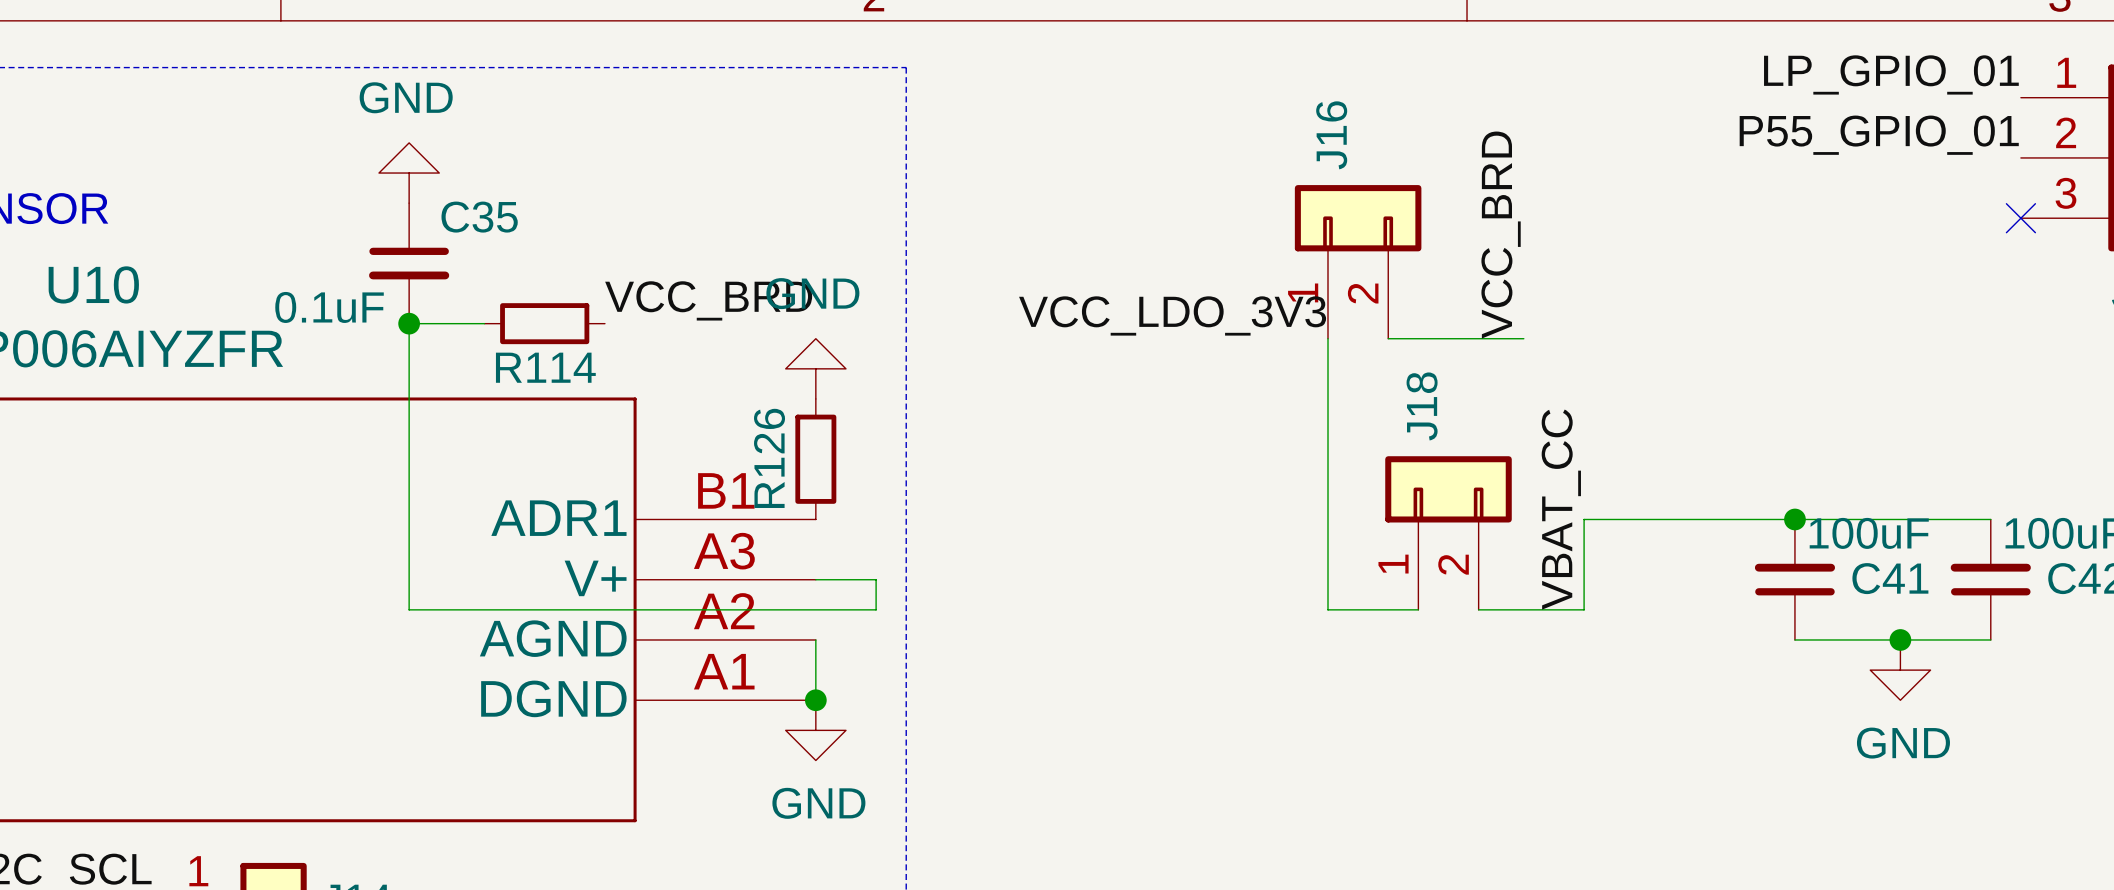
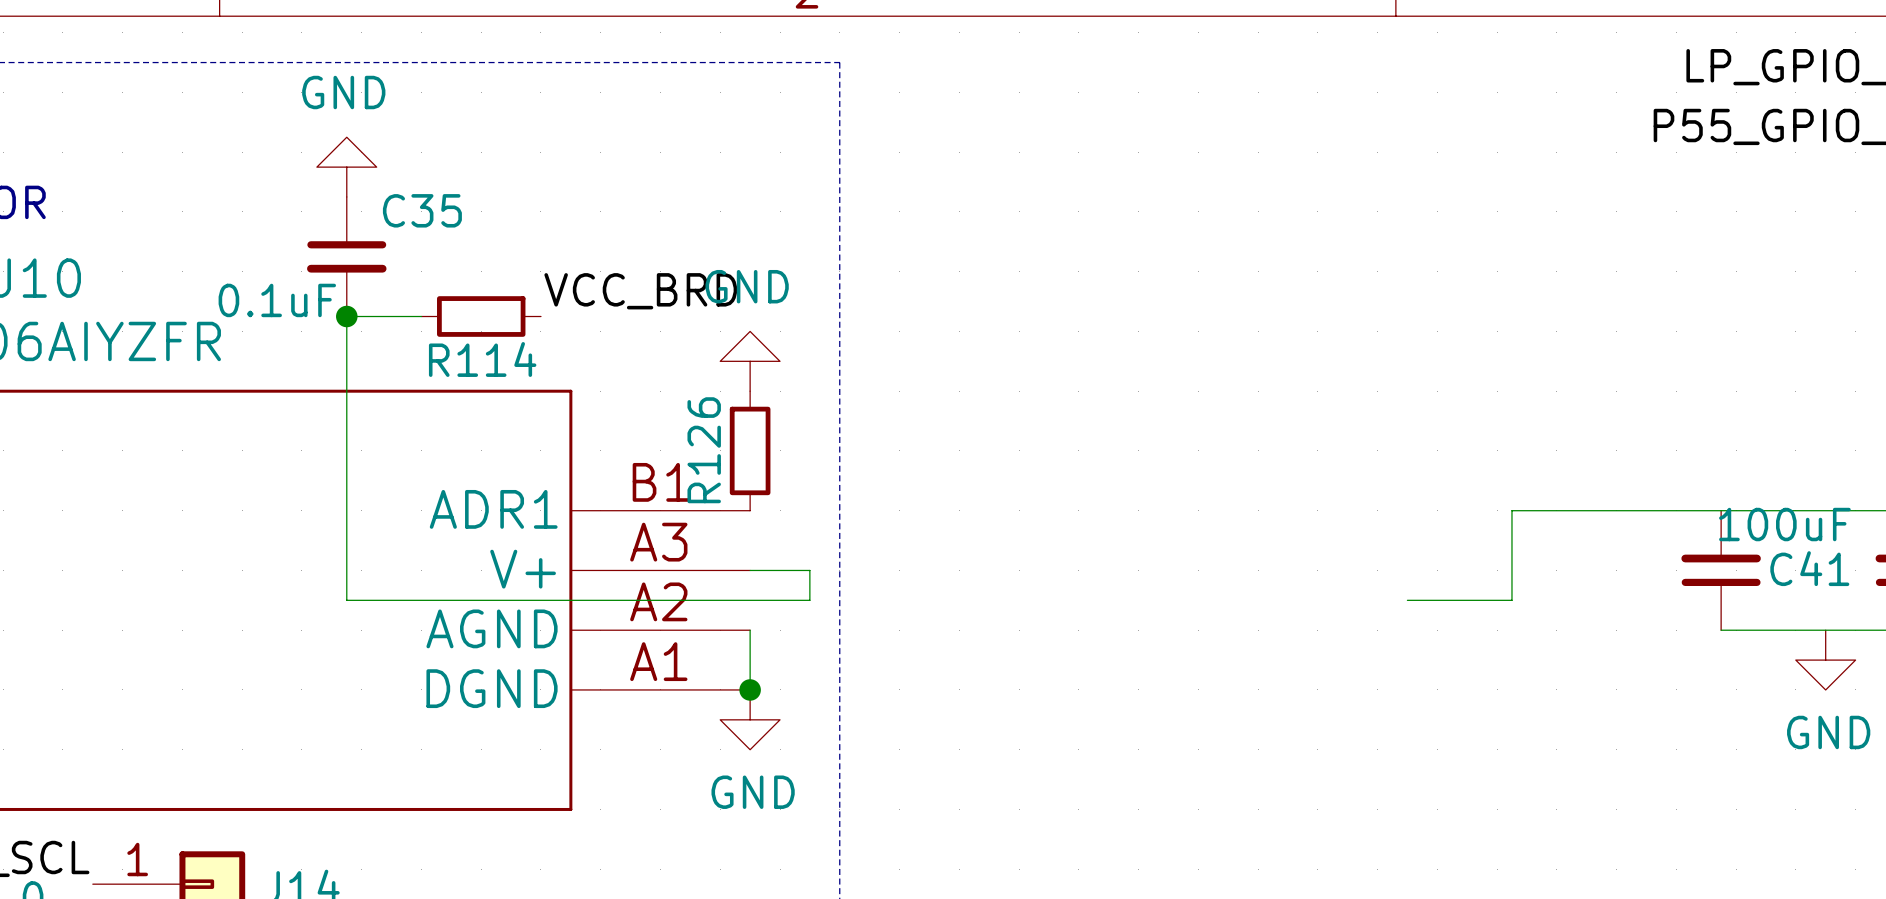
label: VCC_BRD (1501, 235) -> none
J16: (1358, 261) -> none
label: VCC_LDO_3V3 (1172, 315) -> none
wire: (1328, 338) (1328, 609) (1418, 609) -> none
wire: (1388, 338) (1523, 338) -> none
label: VBAT_CC (1561, 509) -> none
junction: (1794, 519) -> none
J18: (1448, 533) -> none
junction: (1900, 639) -> none

